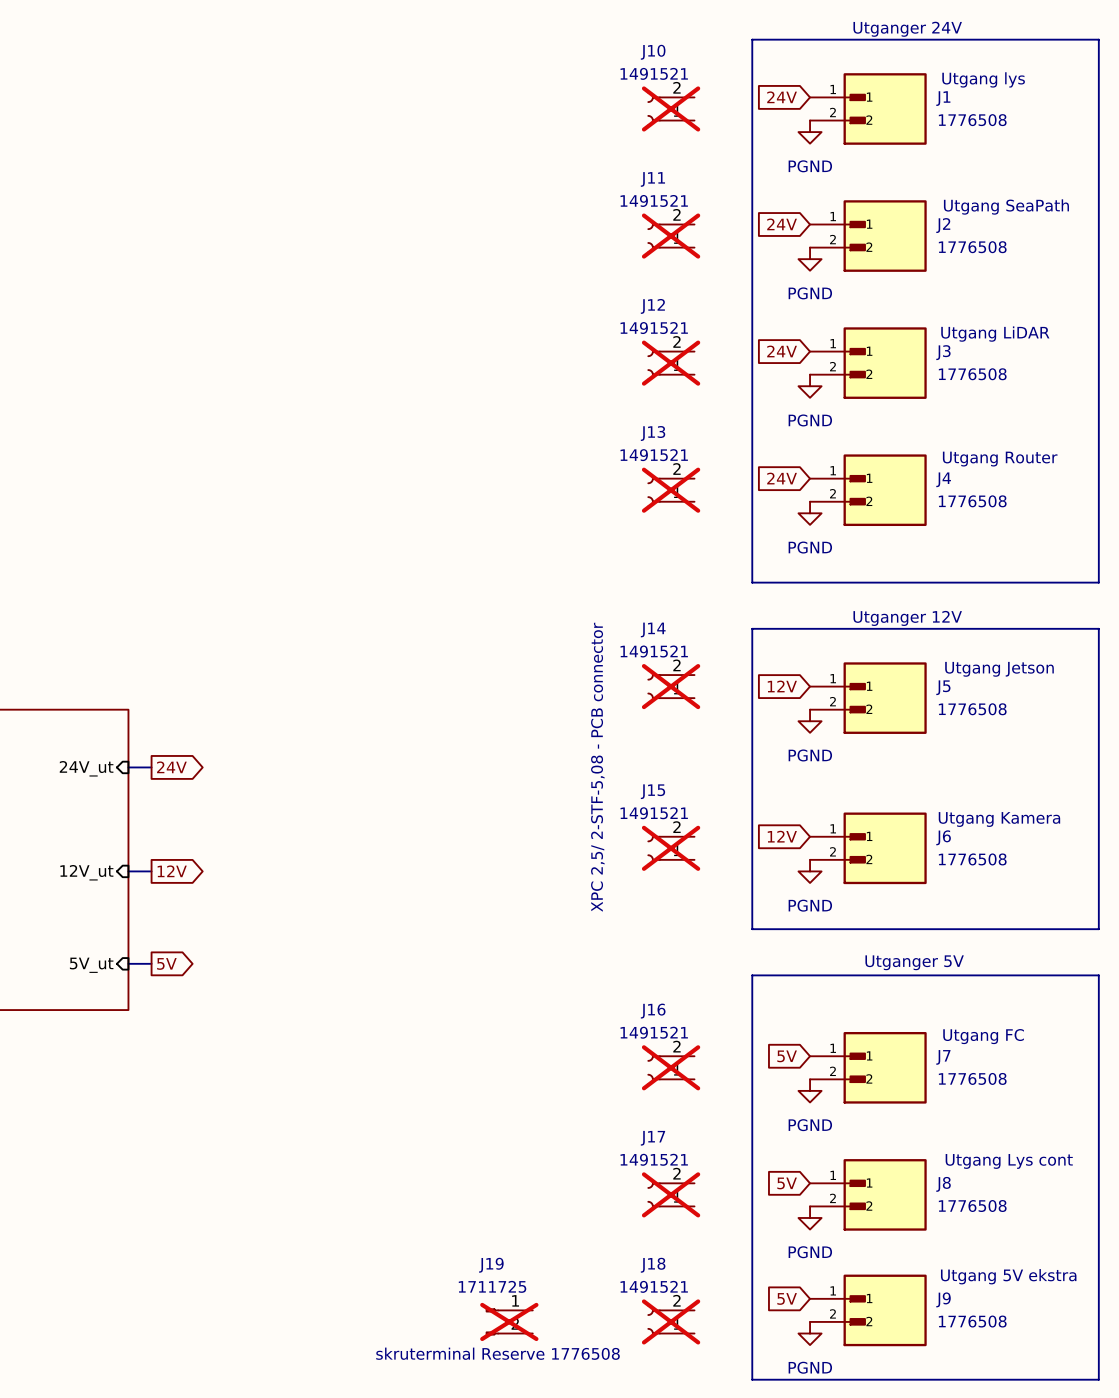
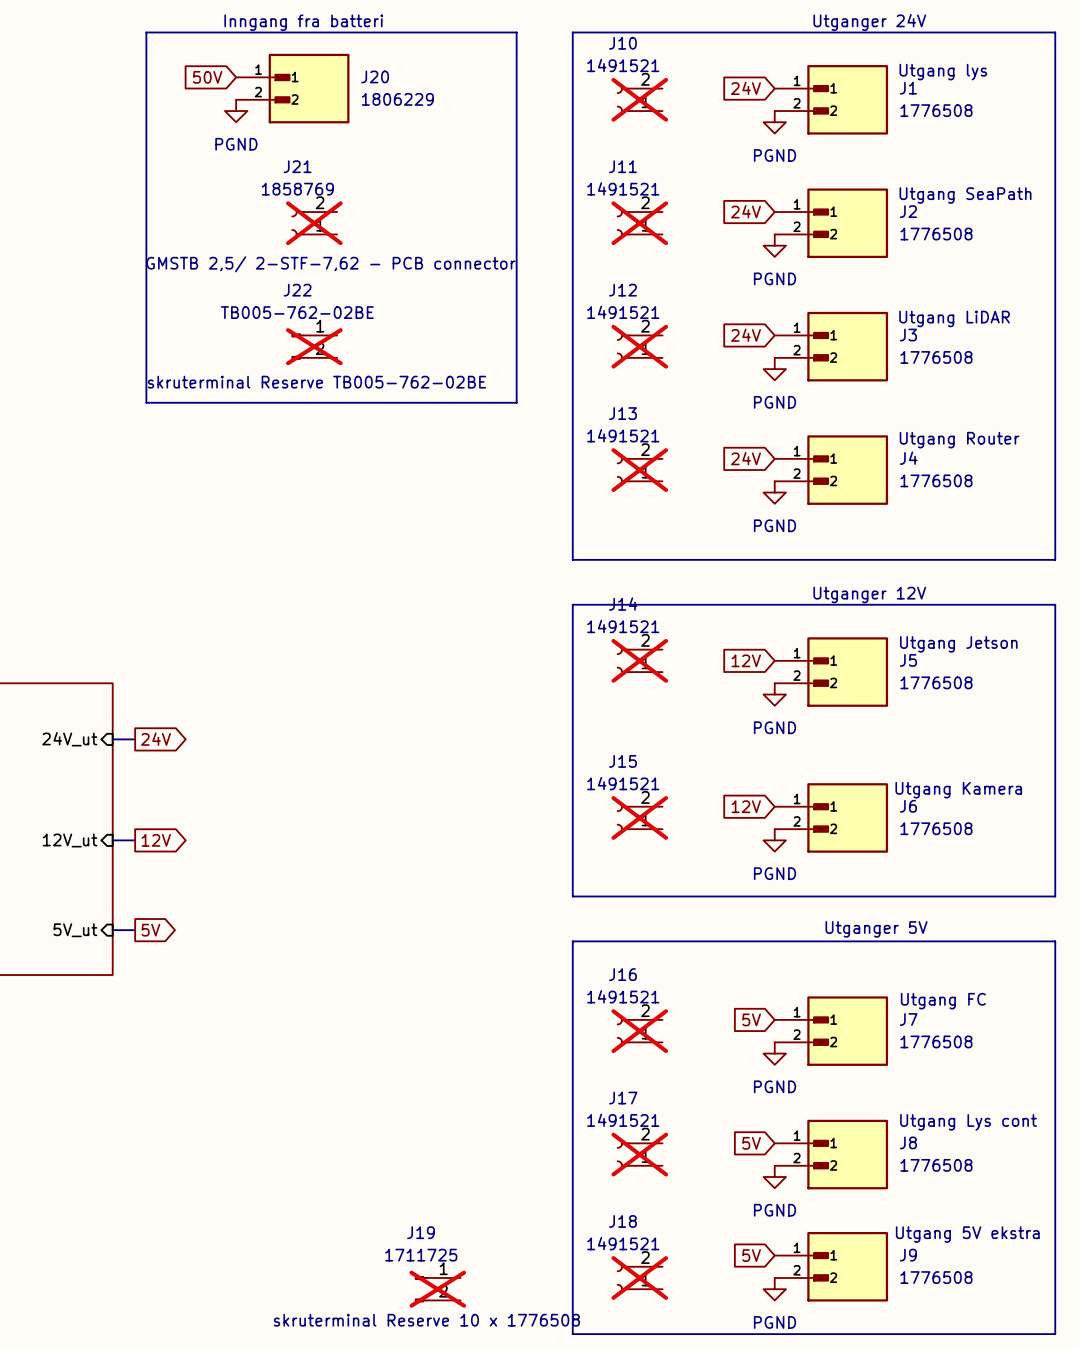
text: none -> Inngang fra batteri (303, 22)
line: none -> (146, 32) (516, 32) (516, 402) (146, 402) (146, 32)
line: (752, 39) (752, 582) -> (718, 32) (572, 32) (572, 559) (718, 559)
global label: none -> 50V (207, 77)
J20: none -> 1806229 (292, 88)
power symbol: none -> PGND (236, 111)
J21: none -> 1858769 (314, 223)
J22: none -> TB005-762-02BE (314, 346)
line: (752, 628) (752, 929) -> (718, 604) (572, 604) (572, 896) (718, 896)
text: XPC 2,5/ 2-STF-5,08 - PCB connector (597, 767) -> none
line: (752, 975) (752, 1379) -> (718, 941) (572, 941) (572, 1334) (718, 1334)
J19 position: (509, 1321) -> (437, 1289)
J19 text: skruterminal Reserve 1776508 (498, 1353) -> skruterminal Reserve 10 x 1776508 (426, 1320)

